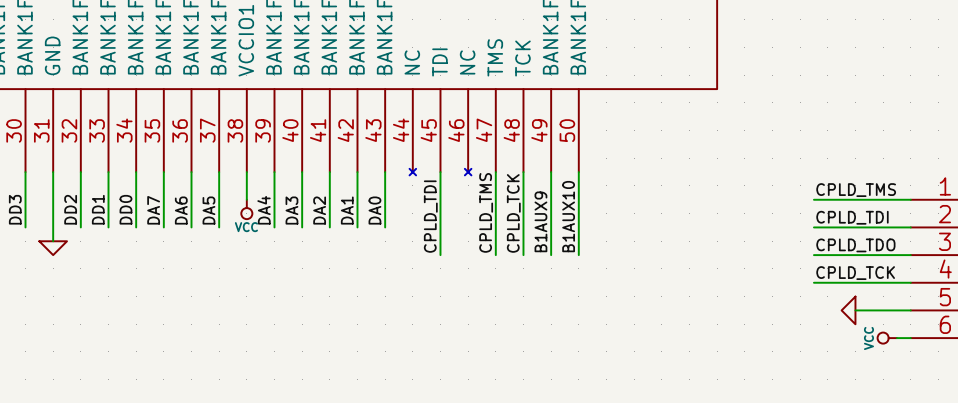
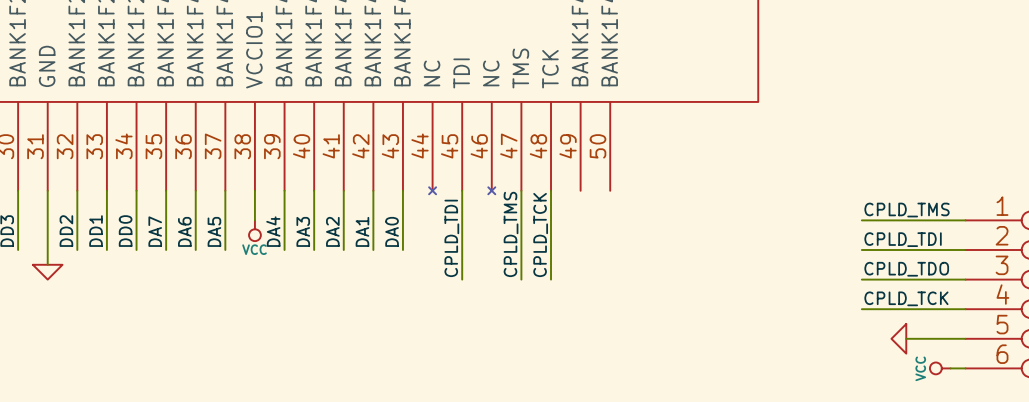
wire: (551, 172) (551, 255) -> none
wire: (578, 172) (578, 255) -> none
label: B1AUX10 (568, 216) -> none
label: B1AUX9 (540, 221) -> none

